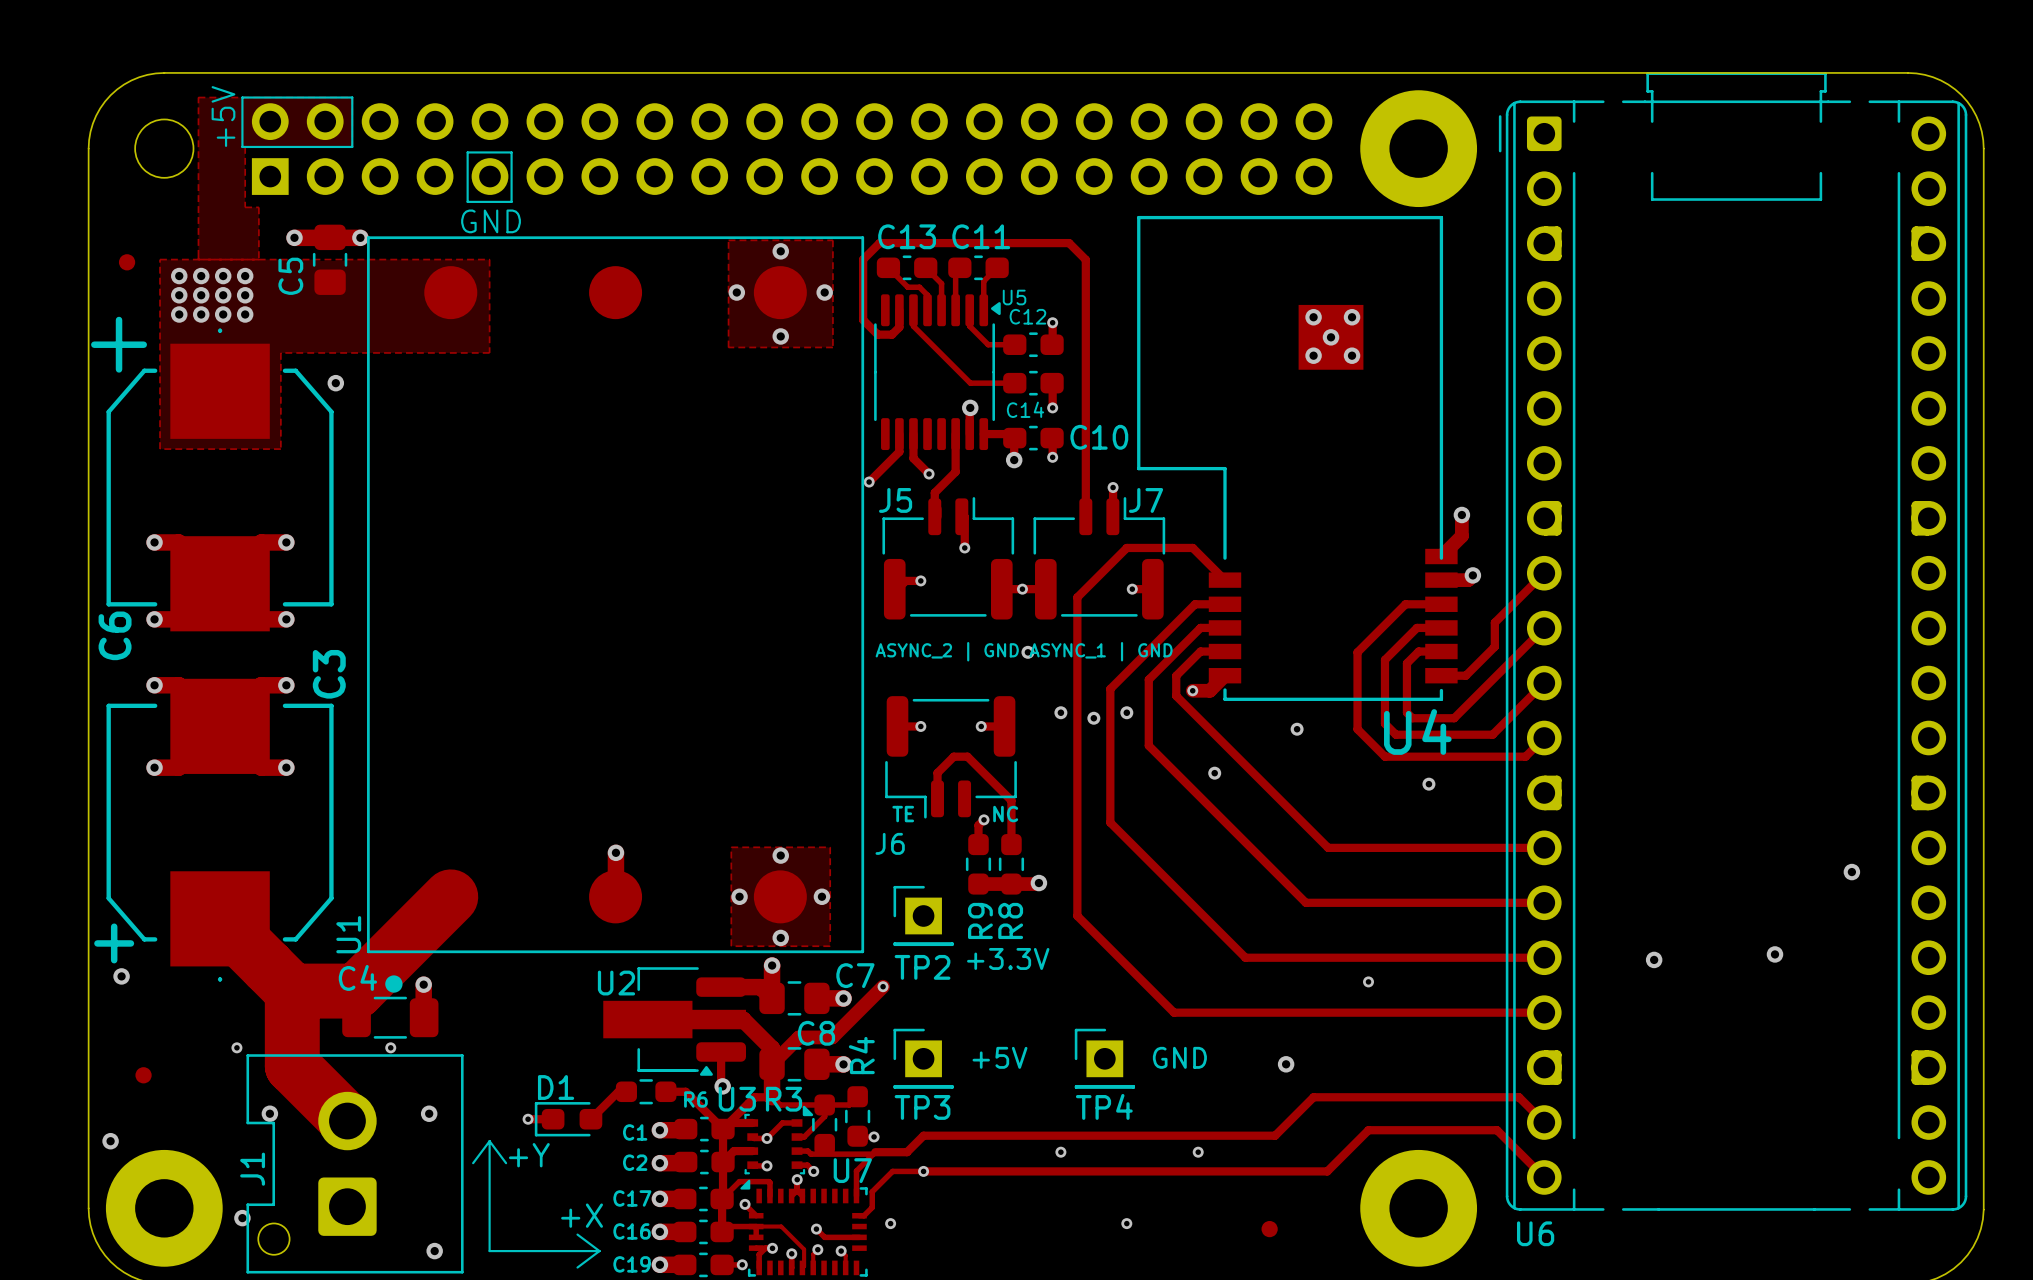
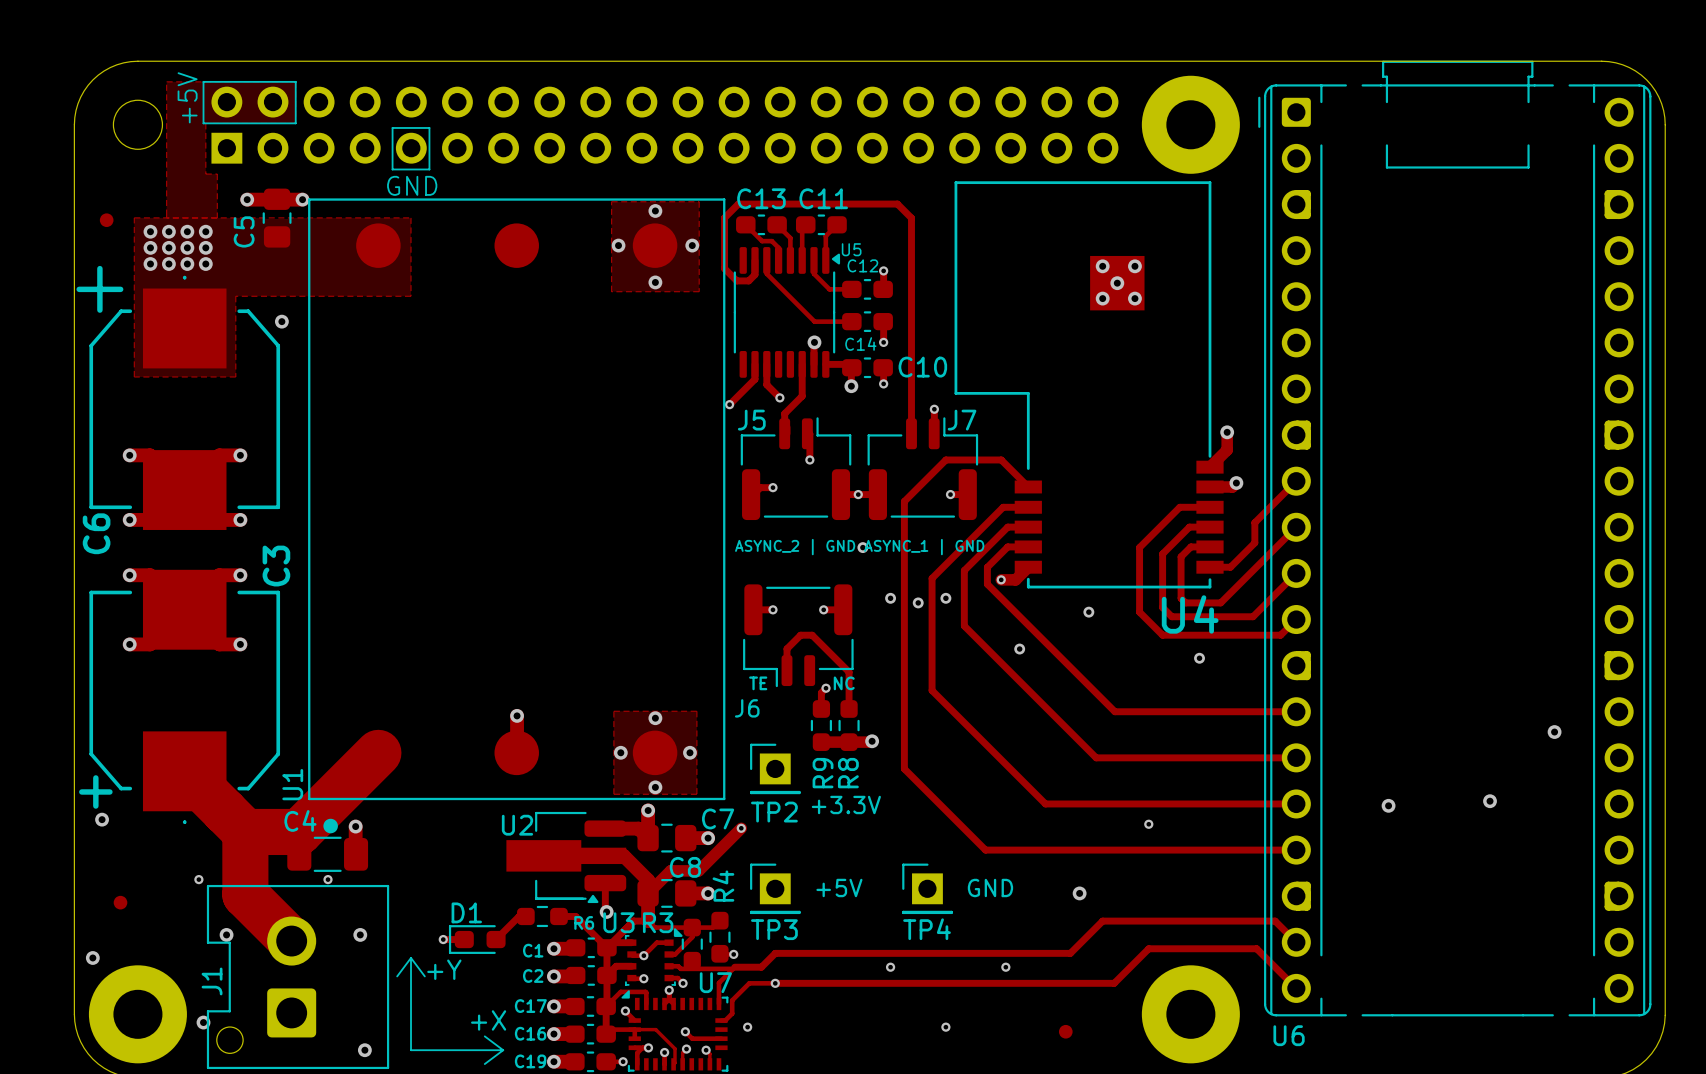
U4 footprint: [1137, 215, 1458, 701] -> [954, 181, 1224, 589]

